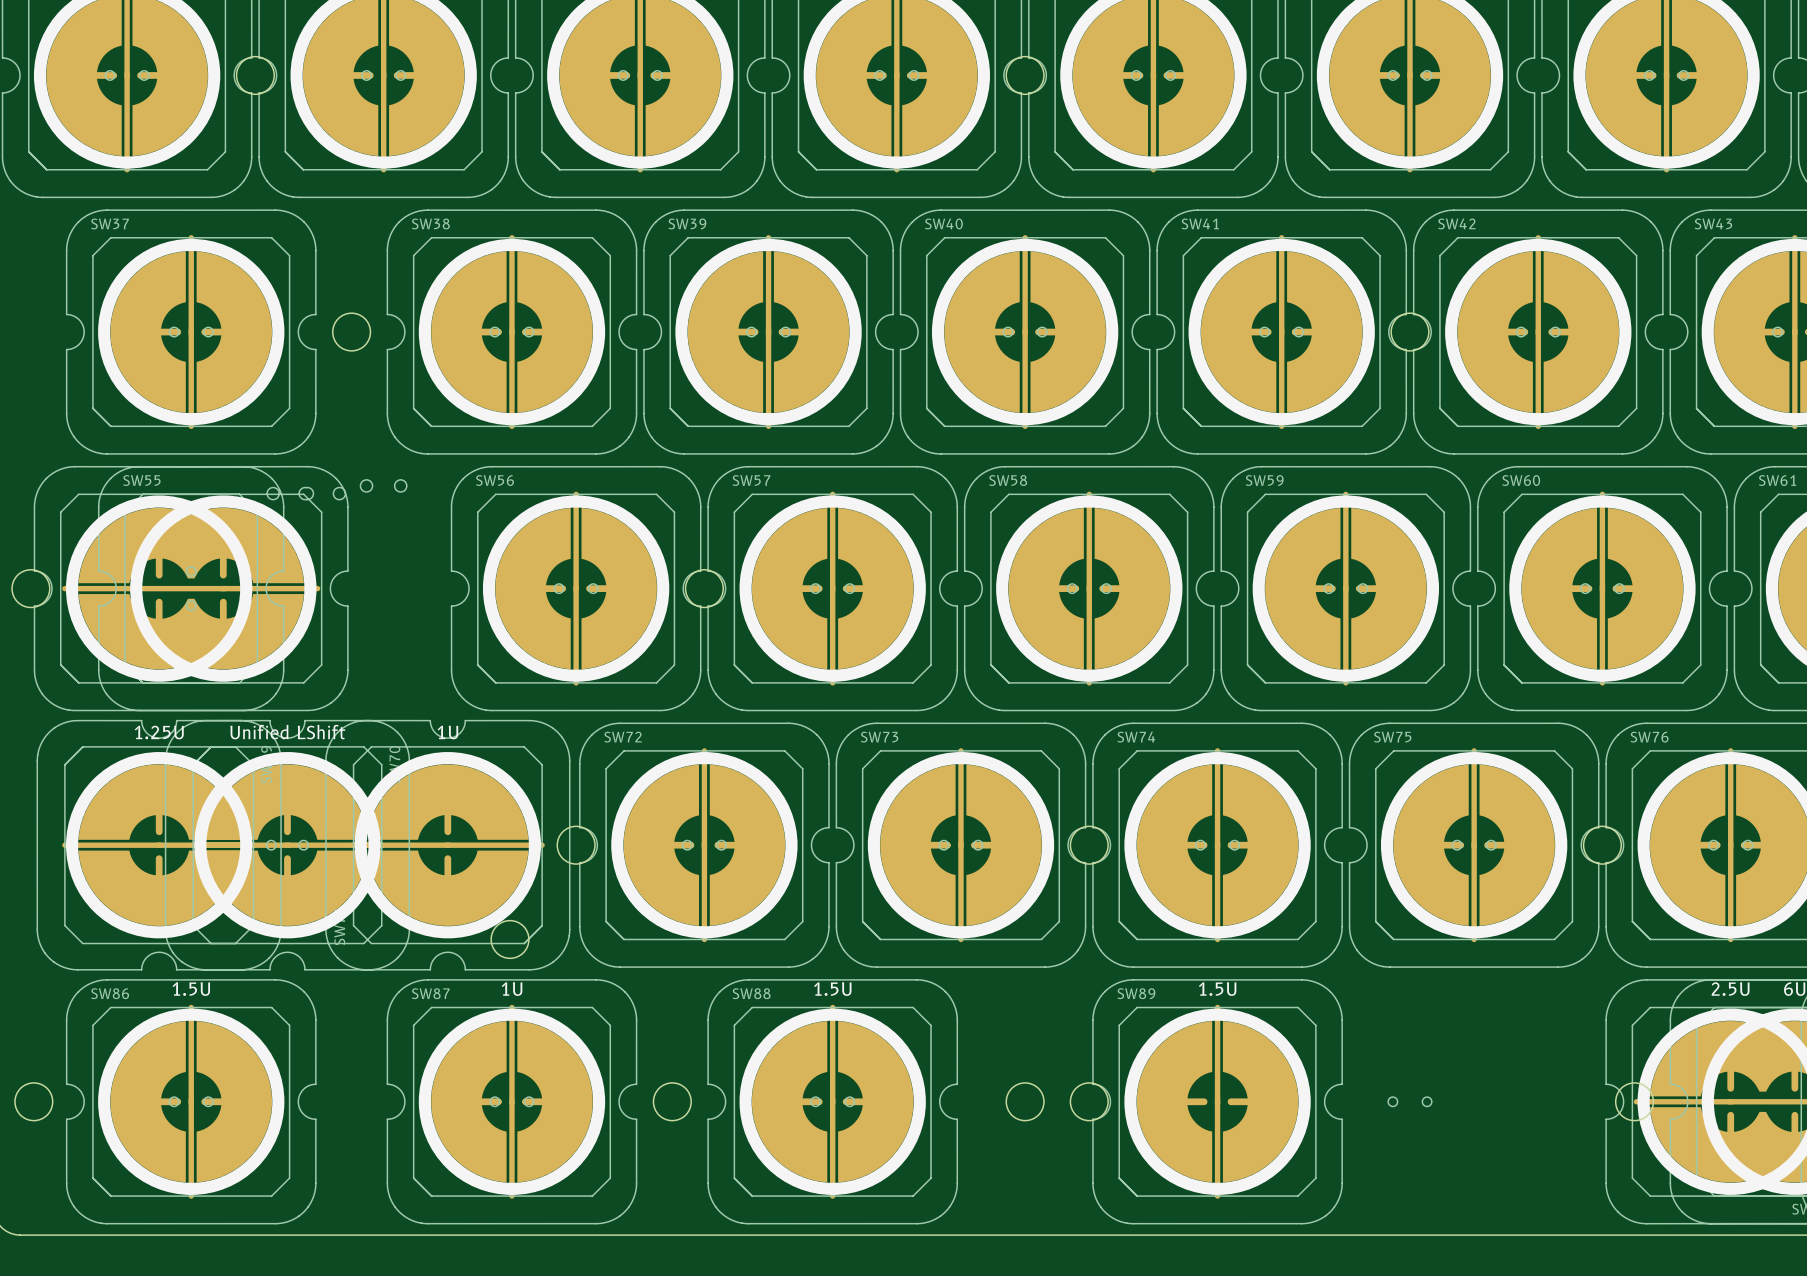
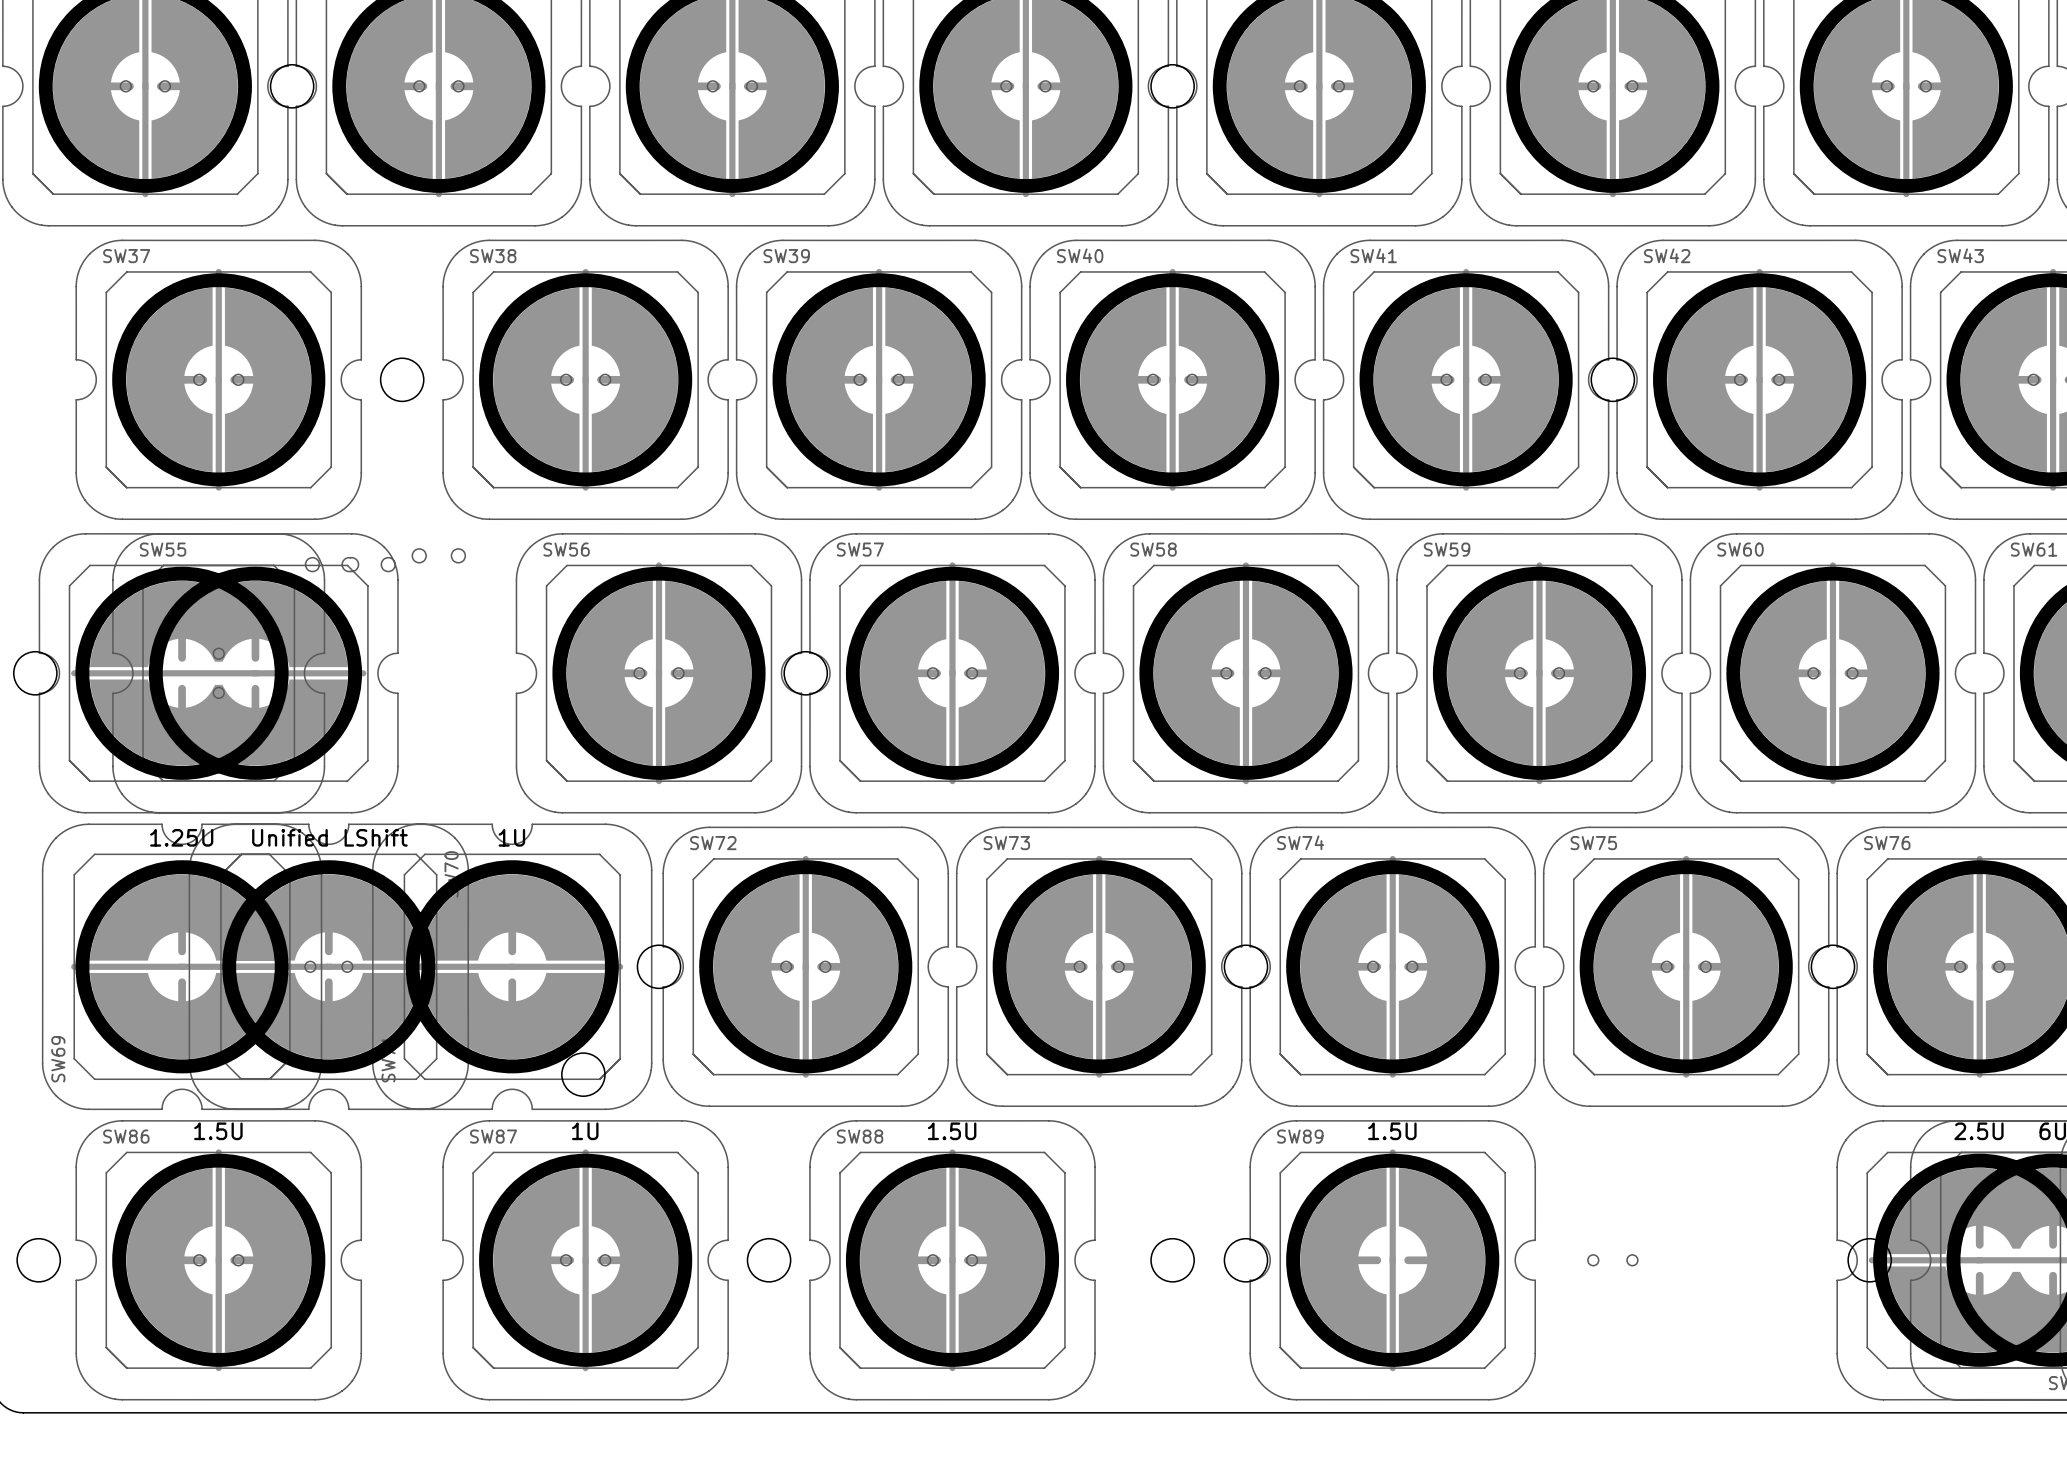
SW69 rotation: 0° (159, 845) -> 180° (182, 966)

